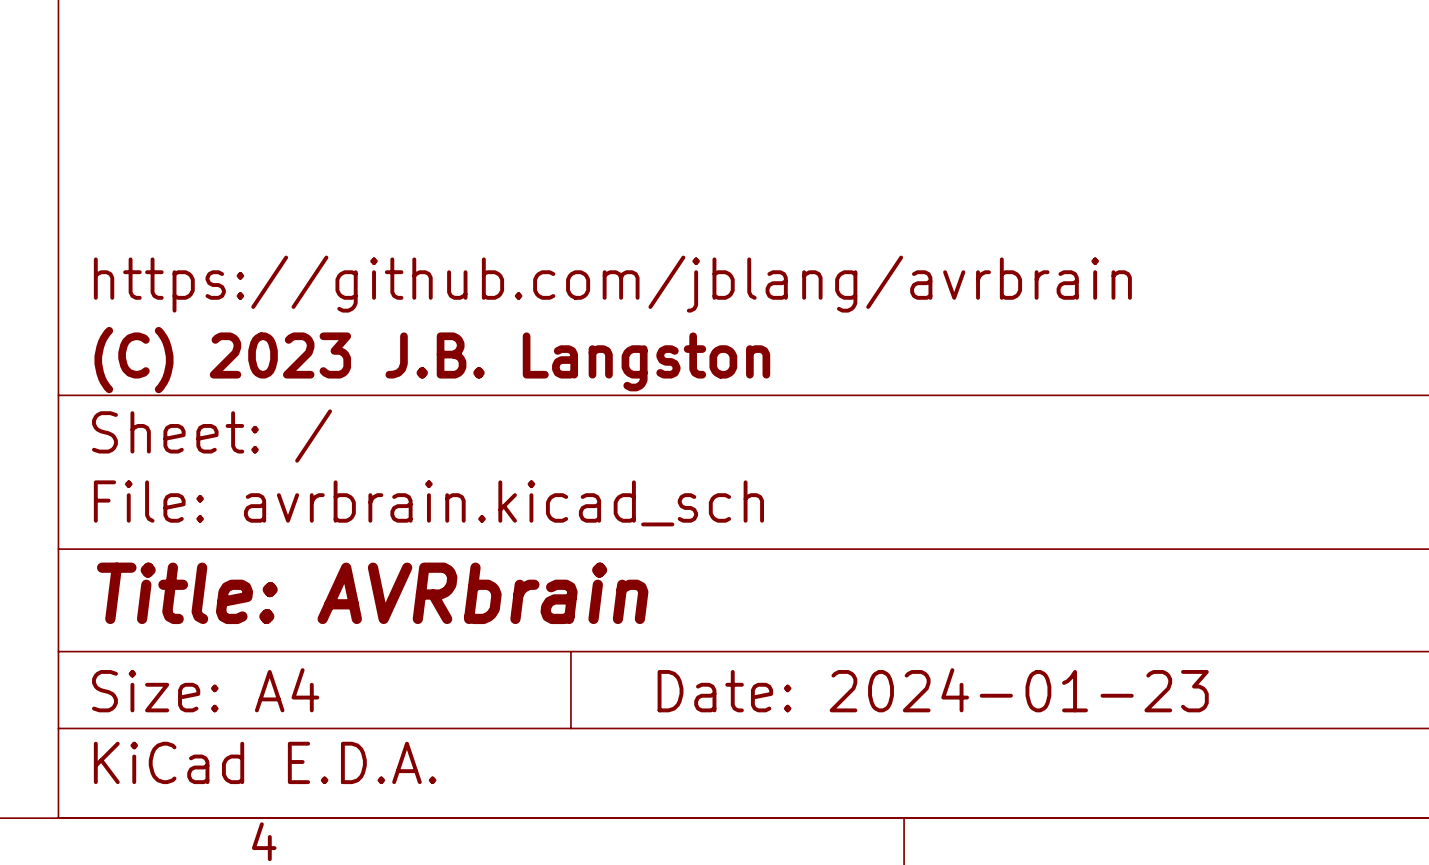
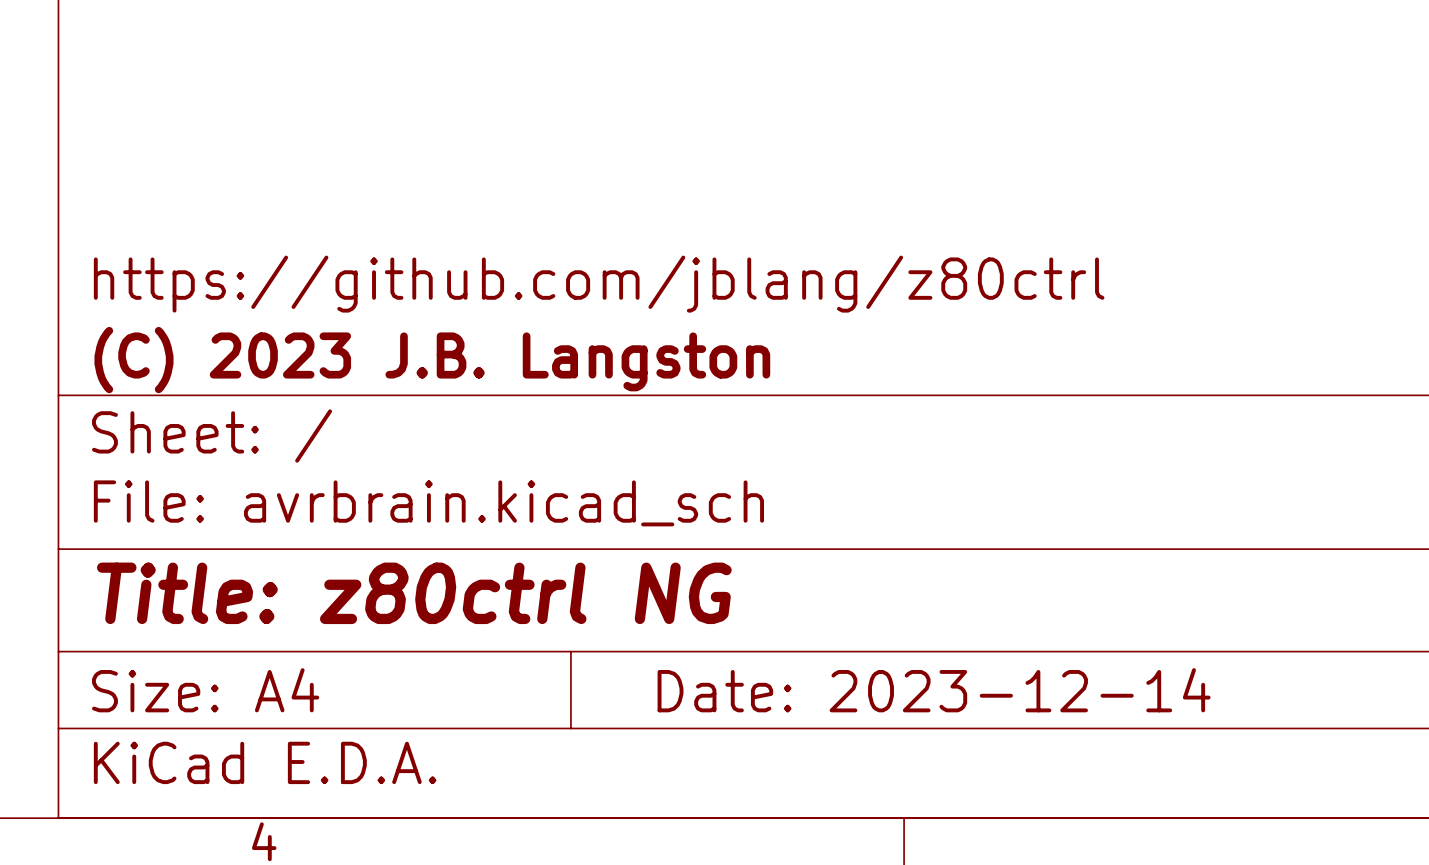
title block: https://github.com/jblang/avrbrain (612, 284) -> https://github.com/jblang/z80ctrl (599, 284)
title block: Title: AVRbrain (372, 593) -> Title: z80ctrl NG (414, 593)
title block: Date: 2024-01-23 (933, 690) -> Date: 2023-12-14 (934, 690)

